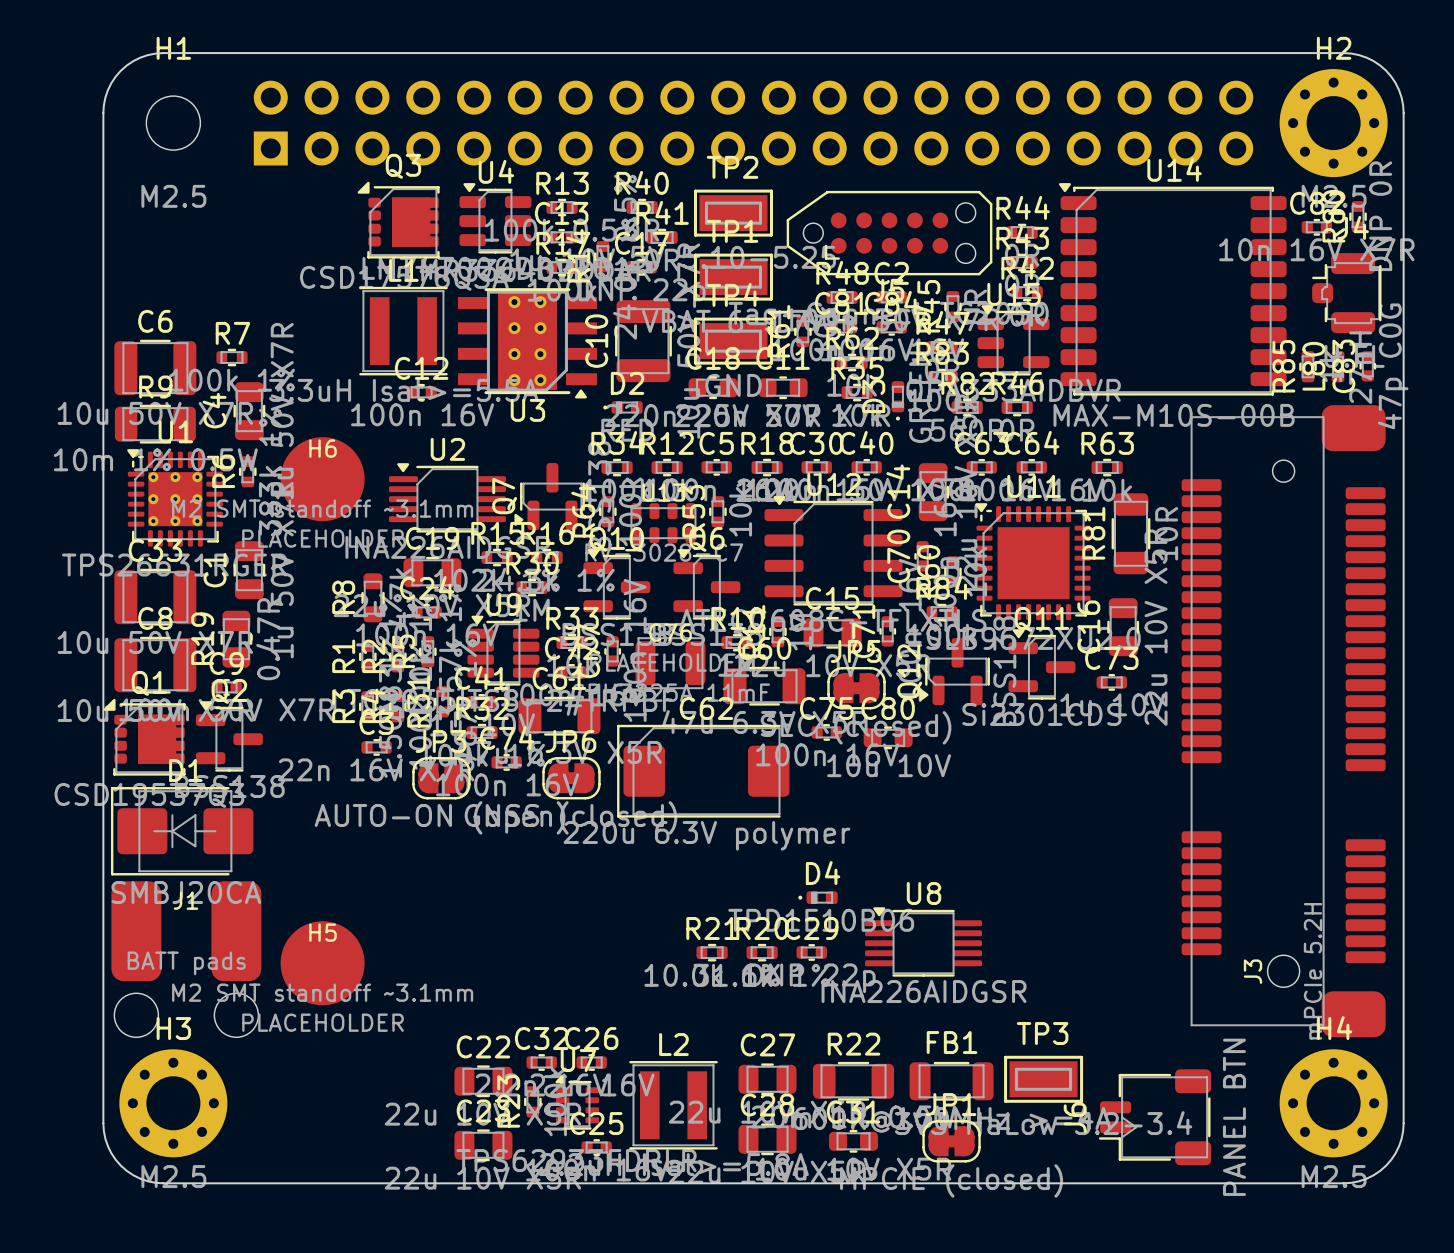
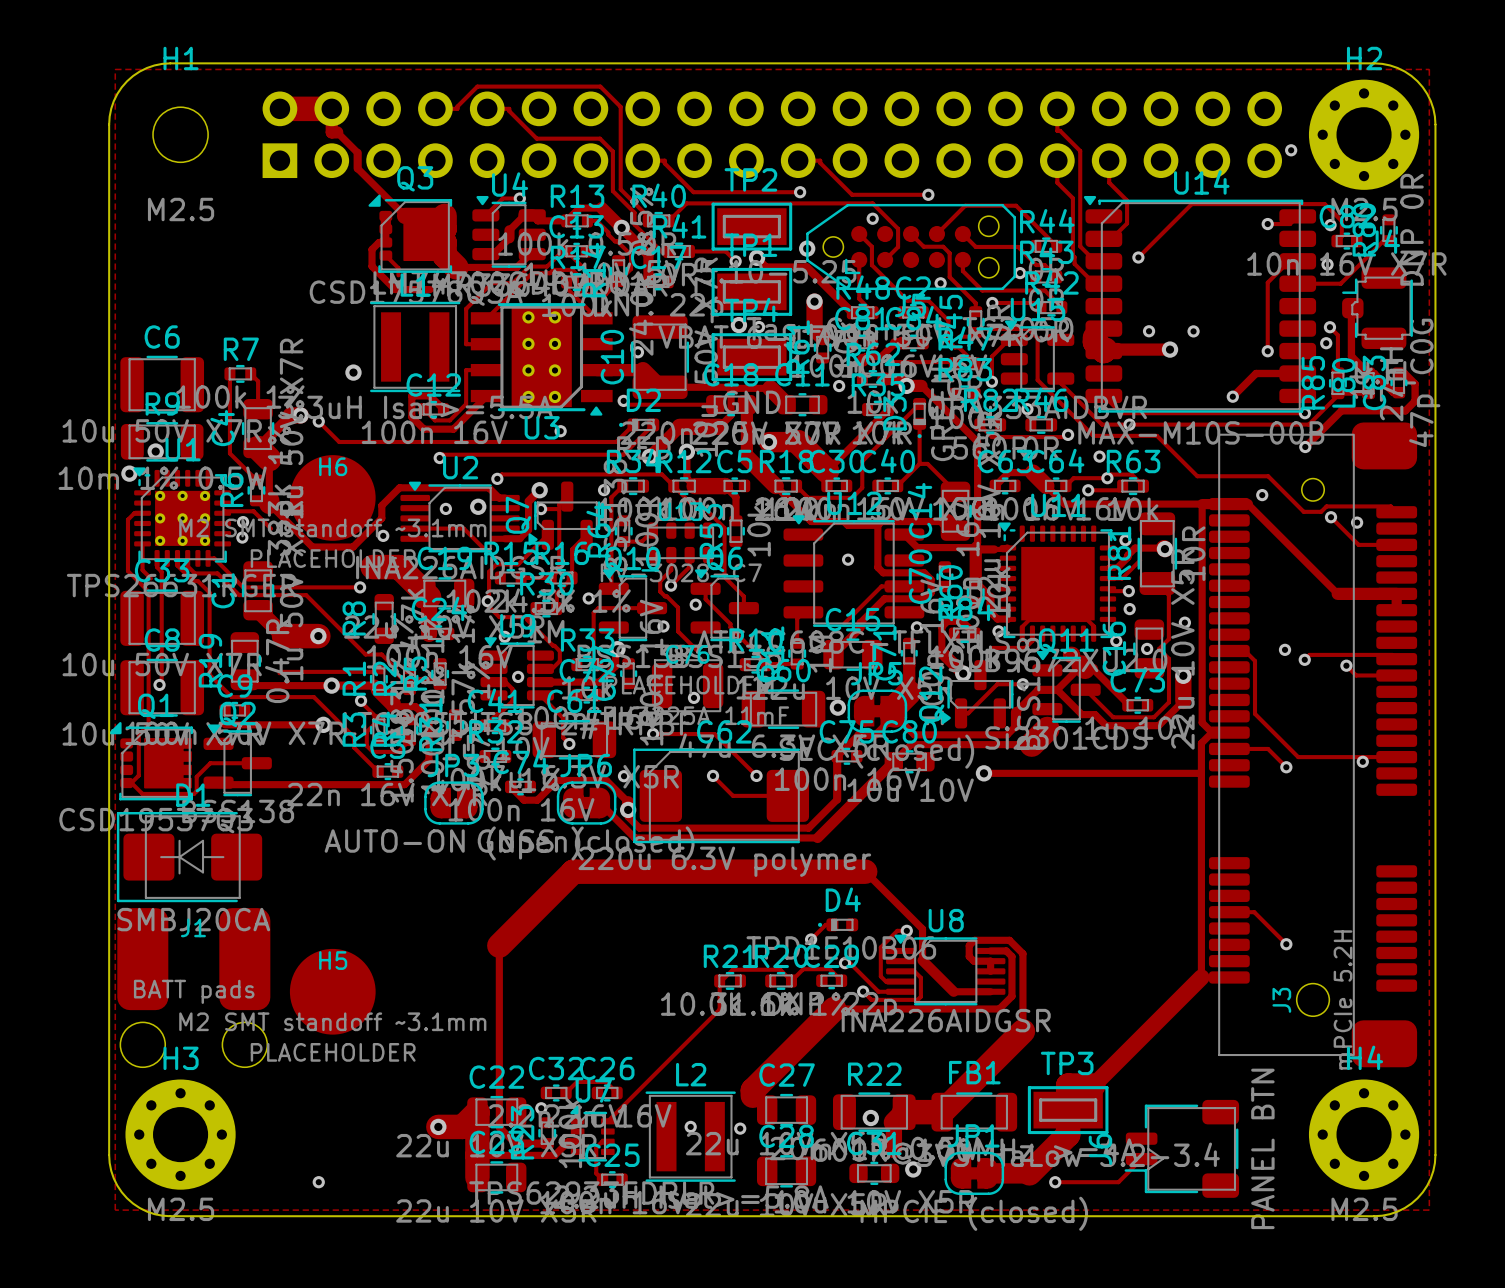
zone outline: none -> (115, 69) (1429, 69) (1429, 1210) (115, 1210) (115, 69)
track: none -> (279, 108) (331, 108) (331, 132) (337, 132) (357, 152) (357, 168) (405, 215) (444, 215) (444, 229) (437, 235)
track: none -> (435, 108) (457, 108) (457, 106) (477, 86) (600, 86) (620, 106) (620, 189) (648, 216) (648, 220)
track: none -> (487, 108) (509, 108) (509, 111) (536, 138) (600, 138) (612, 151) (612, 191) (634, 212) (634, 224) (661, 251) (668, 251)
track: none -> (1057, 108) (1057, 130) (1060, 130) (1080, 150) (1080, 246) (1095, 261) (1103, 261)
via: none -> (1291, 150)
track: none -> (642, 160) (664, 160) (664, 163) (693, 192) (800, 192)
track: none -> (798, 160) (820, 160) (820, 162) (852, 194) (928, 194)
track: none -> (1057, 160) (1057, 182) (1072, 198) (1074, 263) (1094, 283) (1103, 283)
track: none -> (1109, 160) (1109, 182) (1127, 200) (1127, 223) (1111, 238) (1103, 238)
via: none -> (800, 192)
via: none -> (928, 194)
track: none -> (519, 198) (502, 198) (485, 215)
via: none -> (519, 198)
track: none -> (385, 215) (385, 242) (379, 242) (372, 249) (372, 266) (395, 289) (430, 289)
track: none -> (1297, 216) (1290, 224) (1267, 224)
via: none -> (872, 218)
track: none -> (587, 220) (596, 220) (615, 241) (617, 241) (631, 255) (631, 269) (605, 294) (582, 294) (577, 288) (577, 274) (572, 269) (553, 269) (549, 273) (532, 273) (486, 318)
track: none -> (669, 220) (686, 203) (872, 203) (898, 228) (898, 246) (885, 259)
via: none -> (1267, 224)
via: none -> (1330, 225)
via: none -> (621, 227)
track: none -> (859, 234) (871, 246) (871, 265) (907, 300) (928, 300) (948, 320) (948, 341) (954, 347) (958, 347) (975, 363)
track: none -> (911, 234) (923, 246) (943, 246) (949, 253) (949, 277) (975, 303) (975, 311)
track: none -> (936, 234) (965, 205) (1016, 205) (1056, 246)
track: none -> (962, 234) (975, 246) (1018, 246) (1036, 265) (1044, 265) (1056, 276)
track: none -> (437, 235) (444, 242) (444, 255) (456, 267) (516, 267) (532, 254)
track: none -> (1388, 240) (1383, 240) (1340, 283) (1297, 283)
track: none -> (1337, 241) (1341, 236) (1341, 221) (1324, 204) (1191, 204) (1138, 257)
via: none -> (807, 248)
track: none -> (689, 251) (725, 251) (735, 261)
track: none -> (485, 254) (493, 254) (509, 238) (509, 230) (524, 215) (532, 215) (537, 220) (566, 220) (579, 208) (601, 208) (648, 254) (648, 281)
track: none -> (385, 255) (398, 268) (398, 275)
track: none -> (757, 257) (766, 266) (806, 266) (852, 312)
via: none -> (757, 257)
via: none -> (1138, 257)
track: none -> (859, 259) (859, 298) (873, 312)
track: none -> (962, 259) (962, 271) (982, 290) (1044, 290) (1061, 307)
via: none -> (735, 261)
track: none -> (1297, 261) (1289, 261) (1267, 282) (1267, 351)
via: none -> (1327, 264)
via: none -> (1020, 273)
track: none -> (566, 282) (566, 288) (596, 318)
track: none -> (587, 282) (587, 271) (566, 251) (562, 251) (547, 266) (529, 266) (512, 283) (491, 283) (466, 308) (466, 344) (486, 344)
via: none -> (940, 283)
track: none -> (814, 301) (814, 329) (822, 337)
via: none -> (814, 301)
track: none -> (992, 302) (1036, 302) (1041, 307)
via: none -> (992, 302)
track: none -> (1352, 308) (1351, 356) (1368, 373) (1374, 373) (1393, 392) (1398, 392)
via: none -> (738, 325)
via: none -> (759, 327)
track: none -> (1329, 327) (1337, 335) (1337, 372)
via: none -> (1329, 327)
track: none -> (1103, 328) (1094, 337) (1094, 342) (1103, 351) (1170, 349)
via: none -> (1149, 331)
via: none -> (1193, 331)
track: none -> (959, 336) (971, 336) (979, 329) (1028, 329) (1037, 338) (1037, 380) (1093, 435) (1156, 435) (1197, 476) (1268, 476) (1303, 511) (1321, 511) (1326, 506) (1390, 506) (1396, 512)
track: none -> (1014, 339) (1008, 339) (991, 356) (991, 381)
track: none -> (903, 343) (894, 343) (881, 356) (866, 356) (862, 360)
via: none -> (1326, 343)
via: none -> (1170, 349)
via: none -> (1267, 351)
via: none -> (637, 352)
track: none -> (893, 362) (952, 362) (954, 363)
track: none -> (486, 370) (466, 370) (466, 404) (449, 420) (435, 420) (423, 409)
track: none -> (596, 370) (642, 370) (660, 387) (731, 388)
via: none -> (353, 372)
track: none -> (1398, 373) (1404, 373) (1415, 383) (1415, 401) (1405, 410) (1341, 410) (1305, 446)
track: none -> (229, 373) (229, 453) (256, 480)
track: none -> (250, 373) (258, 381) (258, 409)
track: none -> (1297, 373) (1256, 373) (1232, 396)
track: none -> (883, 379) (899, 379) (906, 385) (921, 385) (977, 441) (977, 543) (973, 547)
track: none -> (1060, 378) (1060, 383) (1102, 424) (1308, 424) (1337, 393) (1368, 393)
via: none -> (991, 381)
via: none -> (839, 386)
via: none -> (906, 385)
track: none -> (731, 388) (731, 415) (719, 426) (679, 426) (649, 456)
track: none -> (731, 388) (770, 388) (786, 404)
track: none -> (486, 396) (453, 429) (423, 429) (411, 417) (411, 395) (430, 395) (443, 409)
track: none -> (1103, 395) (1121, 413) (1304, 413)
via: none -> (1232, 396)
track: none -> (623, 400) (627, 404) (715, 404)
via: none -> (623, 400)
track: none -> (746, 404) (746, 457) (811, 521) (843, 521) (847, 525) (877, 525)
track: none -> (919, 404) (862, 461) (862, 487) (852, 497) (808, 497) (796, 486)
track: none -> (888, 409) (826, 471)
via: none -> (1027, 409)
via: none -> (1304, 413)
track: none -> (300, 415) (290, 415) (258, 447) (269, 459) (269, 503) (312, 547) (353, 547) (381, 518) (381, 505) (399, 487) (488, 487) (499, 497) (504, 497)
via: none -> (300, 415)
track: none -> (318, 421) (339, 441) (616, 441) (633, 424)
via: none -> (318, 421)
track: none -> (919, 423) (919, 463)
track: none -> (653, 424) (623, 454) (443, 454) (439, 458)
track: none -> (979, 424) (991, 437) (1065, 437) (1068, 434)
via: none -> (1129, 424)
via: none -> (560, 431)
via: none -> (1068, 434)
track: none -> (768, 442) (798, 442) (826, 471)
via: none -> (768, 442)
via: none -> (1305, 446)
via: none -> (155, 451)
track: none -> (686, 451) (686, 478) (694, 486) (724, 486) (735, 497) (735, 520)
via: none -> (686, 451)
via: none -> (649, 456)
via: none -> (1099, 456)
via: none -> (439, 458)
track: none -> (919, 463) (927, 463) (955, 491)
track: none -> (919, 463) (897, 485)
via: none -> (129, 473)
via: none -> (1107, 478)
track: none -> (497, 478) (501, 474) (662, 474) (690, 502) (699, 502) (724, 528) (724, 577) (743, 596) (743, 608)
via: none -> (497, 478)
track: none -> (622, 486) (611, 497) (611, 586) (613, 588)
track: none -> (995, 485) (1008, 472) (1033, 472) (1064, 504) (1202, 504)
track: none -> (1065, 485) (1073, 478) (1107, 478) (1111, 474) (1131, 474) (1143, 486)
track: none -> (1122, 486) (1118, 490) (1088, 490)
track: none -> (539, 490) (528, 501) (528, 530) (520, 538) (504, 538)
via: none -> (539, 490)
via: none -> (604, 490)
via: none -> (1088, 490)
via: none -> (1262, 495)
track: none -> (567, 496) (559, 504) (559, 570) (551, 577) (521, 577)
track: none -> (1202, 504) (1202, 722) (1212, 732)
track: none -> (1202, 504) (1247, 504) (1337, 593) (1396, 593) (1396, 610)
via: none -> (478, 506)
via: none -> (445, 508)
track: none -> (541, 509) (559, 509)
via: none -> (541, 509)
track: none -> (142, 513) (134, 513) (127, 519) (127, 571) (148, 591) (148, 724) (138, 734) (138, 775) (131, 783) (126, 783)
track: none -> (222, 513) (224, 511) (253, 511) (271, 528)
track: none -> (1331, 517) (1358, 544) (1396, 544)
via: none -> (1331, 517)
via: none -> (243, 522)
via: none -> (1357, 522)
track: none -> (877, 525) (877, 567) (883, 572) (924, 572) (931, 579) (931, 592) (925, 598) (884, 598) (860, 622) (860, 627) (833, 654)
track: none -> (877, 525) (881, 521) (946, 521) (955, 530)
track: none -> (415, 528) (463, 528) (488, 553)
track: none -> (652, 530) (641, 541) (623, 541)
track: none -> (547, 534) (518, 564) (496, 564) (489, 571) (489, 606) (499, 617) (527, 617) (527, 620) (559, 651) (559, 661) (552, 668) (540, 668)
track: none -> (586, 534) (572, 549) (572, 577) (556, 593) (556, 608)
track: none -> (904, 534) (917, 547) (973, 547)
via: none -> (383, 535)
via: none -> (242, 537)
via: none -> (1125, 540)
track: none -> (142, 543) (142, 570) (150, 578)
track: none -> (1007, 547) (975, 550)
track: none -> (1164, 549) (1135, 548) (1118, 566) (1107, 568)
via: none -> (1164, 549)
track: none -> (975, 550) (975, 582) (990, 596) (990, 612) (997, 619) (1007, 619)
track: none -> (671, 555) (671, 570) (660, 581) (660, 591) (678, 607) (678, 631) (697, 651)
track: none -> (689, 555) (689, 566) (671, 585)
track: none -> (157, 558) (157, 567) (161, 571) (161, 682) (159, 684)
track: none -> (177, 558) (177, 565) (192, 581) (198, 581) (209, 592) (209, 674) (231, 697) (313, 697) (354, 737) (354, 747) (378, 771)
track: none -> (187, 558) (187, 566) (194, 573) (217, 573) (239, 595) (306, 595) (365, 654) (381, 654) (396, 668) (396, 672) (402, 679) (434, 679) (440, 684)
track: none -> (208, 558) (214, 558) (243, 587) (360, 587)
via: none -> (848, 559)
track: none -> (1140, 560) (1122, 578) (1107, 578)
track: none -> (372, 567) (399, 567) (429, 597) (429, 633)
track: none -> (1157, 583) (1168, 595) (1168, 639) (1159, 648) (1168, 658) (1168, 702) (1153, 717) (1113, 717) (1085, 689)
via: none -> (671, 585)
track: none -> (904, 586) (881, 586) (844, 623)
via: none -> (360, 587)
track: none -> (705, 588) (705, 599) (767, 664)
track: none -> (1107, 588) (1110, 591) (1128, 591)
via: none -> (1128, 591)
via: none -> (588, 598)
via: none -> (487, 601)
via: none -> (695, 604)
track: none -> (652, 608) (598, 608) (593, 612) (593, 660) (597, 664)
via: none -> (1129, 609)
track: none -> (258, 610) (283, 636) (318, 636)
track: none -> (803, 612) (797, 618) (797, 643)
via: none -> (1184, 622)
via: none -> (663, 626)
via: none -> (916, 627)
via: none -> (998, 631)
track: none -> (975, 634) (962, 621) (947, 621) (941, 627) (941, 652) (963, 673)
track: none -> (1022, 633) (1022, 626) (1029, 620) (1087, 620) (1093, 626) (1093, 633)
track: none -> (1032, 633) (1032, 640) (1025, 647) (992, 647)
via: none -> (318, 636)
via: none -> (504, 636)
via: none -> (1116, 641)
track: none -> (617, 649) (615, 651) (615, 666) (599, 682) (540, 682)
via: none -> (617, 649)
via: none -> (1147, 648)
via: none -> (1285, 649)
track: none -> (1229, 651) (1245, 651) (1255, 660) (1255, 713) (1298, 757) (1396, 757)
track: none -> (1070, 654) (1072, 654)
via: none -> (1304, 659)
track: none -> (1396, 659) (1392, 654) (1309, 654) (1304, 659)
track: none -> (909, 663) (909, 692) (890, 711) (894, 715)
track: none -> (797, 664) (765, 664)
track: none -> (1346, 665) (1356, 675) (1396, 675)
via: none -> (1346, 665)
track: none -> (382, 671) (279, 673)
via: none -> (963, 673)
track: none -> (1183, 675) (1183, 701) (1158, 725) (1106, 725) (1095, 714) (1081, 714) (1057, 689)
via: none -> (1183, 675)
via: none -> (518, 676)
track: none -> (244, 679) (250, 685) (374, 685) (392, 703) (392, 706) (415, 706) (428, 720) (428, 760) (404, 784) (218, 784)
track: none -> (494, 682) (505, 682) (512, 688) (512, 701) (485, 725)
track: none -> (1022, 684) (997, 684) (968, 713) (961, 713)
via: none -> (1022, 684)
via: none -> (159, 684)
via: none -> (331, 685)
track: none -> (1057, 689) (1081, 665) (1084, 668) (1092, 668) (1127, 705)
track: none -> (1057, 689) (1038, 689) (1016, 711) (1016, 726) (1007, 734) (914, 734) (894, 715)
track: none -> (540, 695) (563, 718) (563, 737) (569, 743)
via: none -> (693, 697)
track: none -> (361, 700) (378, 719) (366, 731) (366, 745) (372, 751) (398, 751) (409, 740)
via: none -> (361, 700)
via: none -> (837, 707)
track: none -> (894, 715) (875, 734) (858, 734) (837, 756) (837, 799) (808, 828) (639, 828) (628, 816) (628, 802) (606, 780) (557, 780) (537, 800) (523, 800) (510, 786)
track: none -> (225, 724) (323, 724)
via: none -> (323, 724)
track: none -> (1047, 728) (1031, 744) (910, 744) (817, 837) (634, 837) (599, 803)
track: none -> (1212, 732) (1201, 743) (1201, 977) (1093, 1085) (1068, 1085) (1068, 1134) (1029, 1173) (987, 1173)
track: none -> (653, 734) (714, 734) (756, 775)
via: none -> (653, 734)
via: none -> (569, 743)
track: none -> (1229, 748) (1268, 748) (1286, 767)
via: none -> (1362, 761)
track: none -> (256, 763) (210, 763) (196, 776) (196, 791) (194, 793) (142, 793) (131, 782)
via: none -> (1286, 767)
track: none -> (983, 773) (1201, 773)
via: none -> (983, 773)
via: none -> (624, 776)
track: none -> (713, 775) (733, 795) (787, 795)
via: none -> (713, 775)
via: none -> (756, 775)
via: none -> (628, 809)
track: none -> (1229, 912) (1254, 912) (1286, 944)
track: none -> (832, 924) (825, 924) (811, 939)
track: none -> (906, 930) (897, 930) (880, 947) (880, 976) (885, 981) (900, 981)
via: none -> (906, 930)
via: none -> (811, 939)
via: none -> (1286, 944)
track: none -> (990, 950) (1006, 950) (1011, 956) (1011, 996) (999, 1008) (834, 1008) (752, 1090) (752, 1095)
track: none -> (845, 963) (849, 963) (878, 991) (900, 991)
via: none -> (845, 963)
track: none -> (900, 971) (914, 971) (920, 977) (920, 996) (917, 999) (871, 999) (863, 991)
track: none -> (990, 971) (990, 961) (973, 961) (969, 956) (969, 945) (974, 940) (1009, 940) (1022, 953) (1022, 1031) (942, 1112) (904, 1112) (893, 1122) (893, 1150)
track: none -> (719, 980) (719, 1009) (607, 1121)
track: none -> (841, 980) (829, 969) (803, 969) (791, 980) (780, 969) (732, 969) (719, 982)
via: none -> (863, 991)
track: none -> (990, 991) (953, 991) (922, 960) (922, 929) (865, 871) (573, 871) (499, 945) (499, 1127) (515, 1143) (547, 1143)
track: none -> (566, 1092) (577, 1081) (606, 1081) (617, 1092)
via: none -> (541, 1108)
via: none -> (870, 1118)
track: none -> (438, 1126) (462, 1126) (477, 1112) (477, 1177)
via: none -> (438, 1126)
via: none -> (690, 1126)
via: none -> (740, 1128)
track: none -> (577, 1141) (568, 1141) (554, 1155) (477, 1155)
track: none -> (607, 1141) (602, 1141) (596, 1147) (596, 1173) (602, 1179)
track: none -> (1141, 1159) (1118, 1182) (1055, 1182)
via: none -> (913, 1169)
via: none -> (318, 1182)
via: none -> (1055, 1182)

